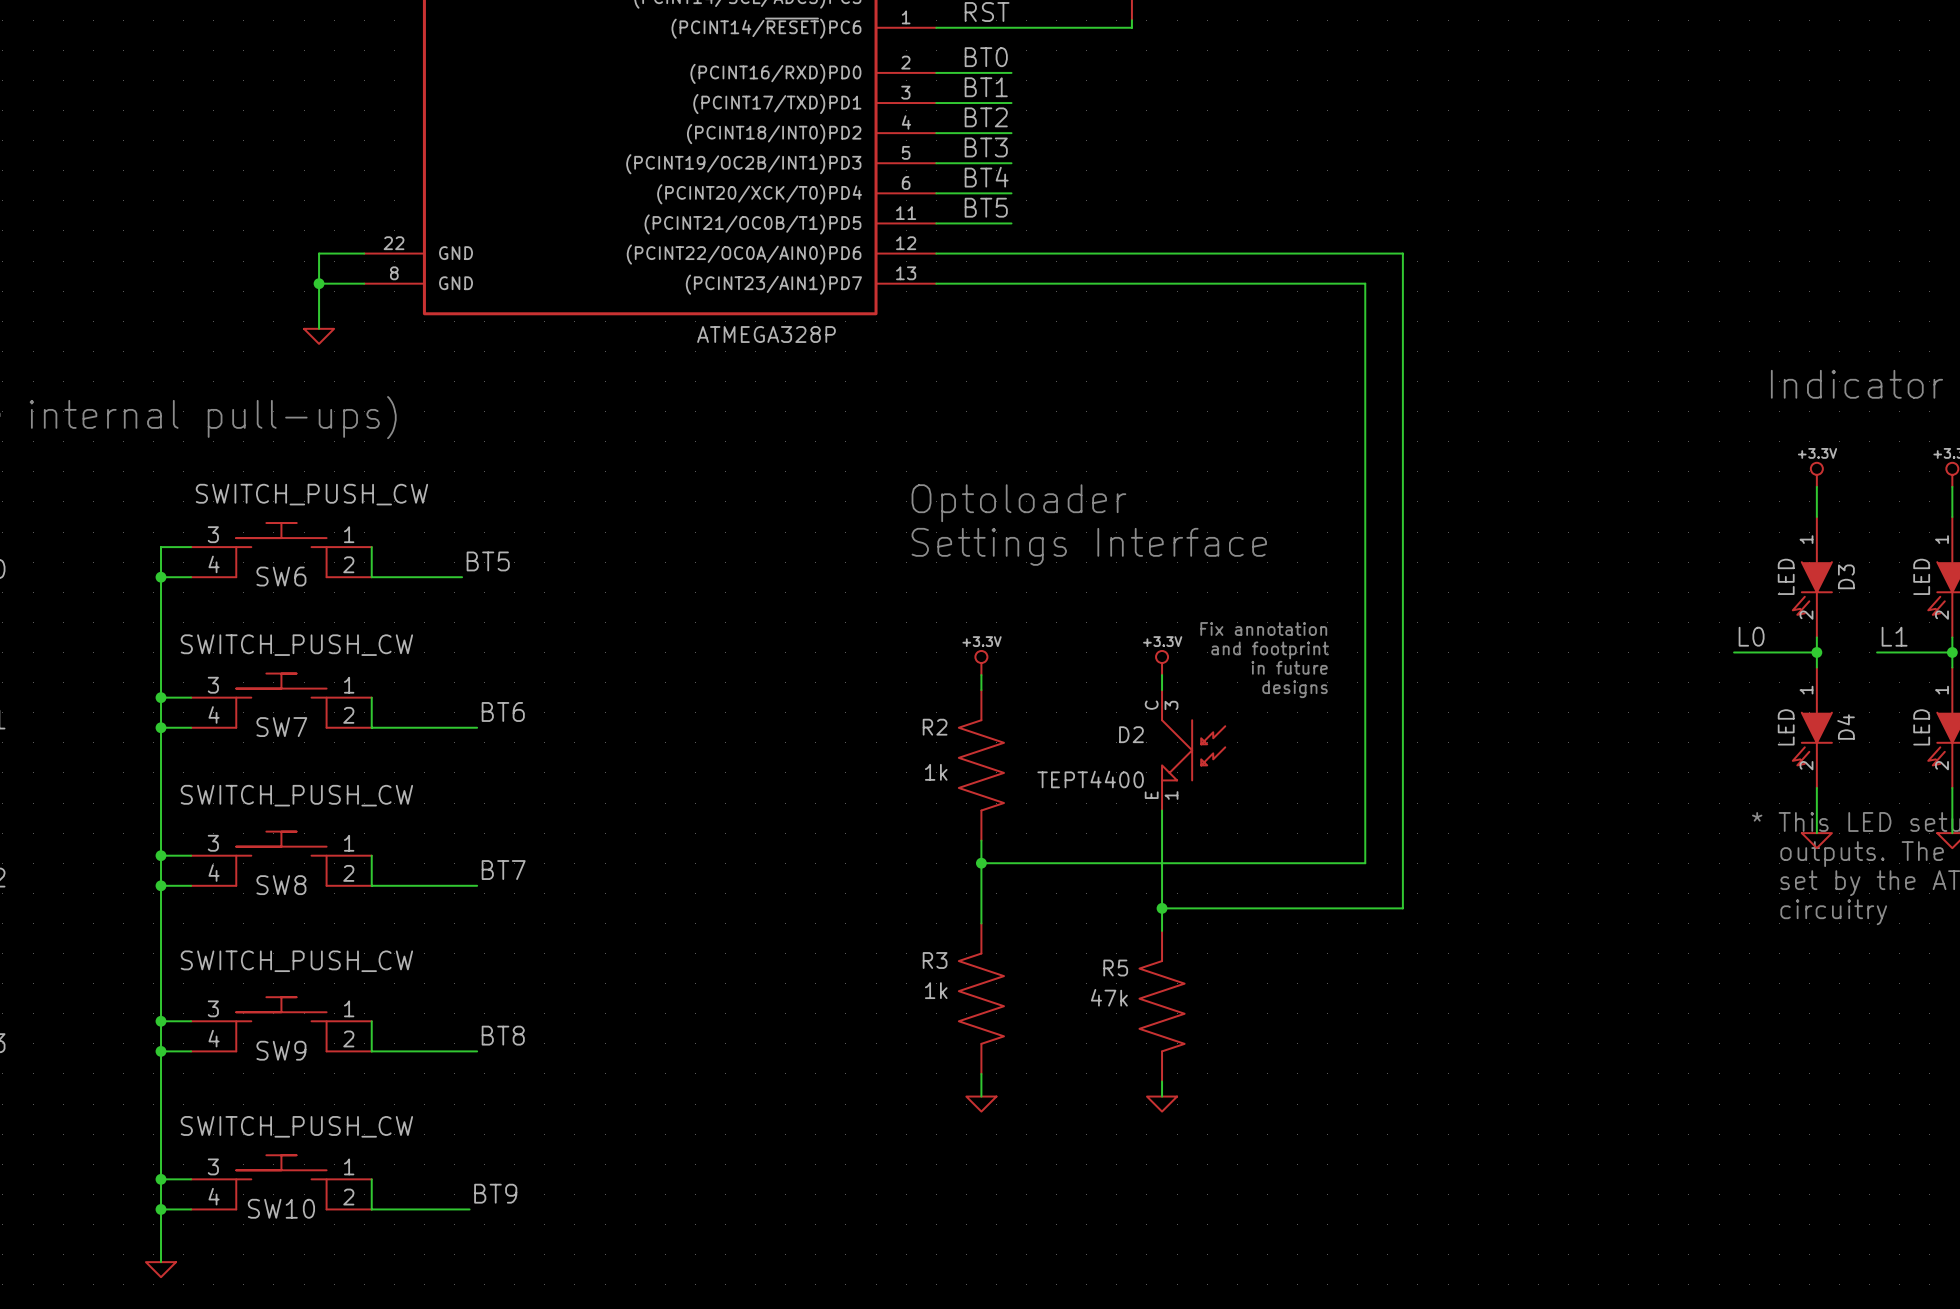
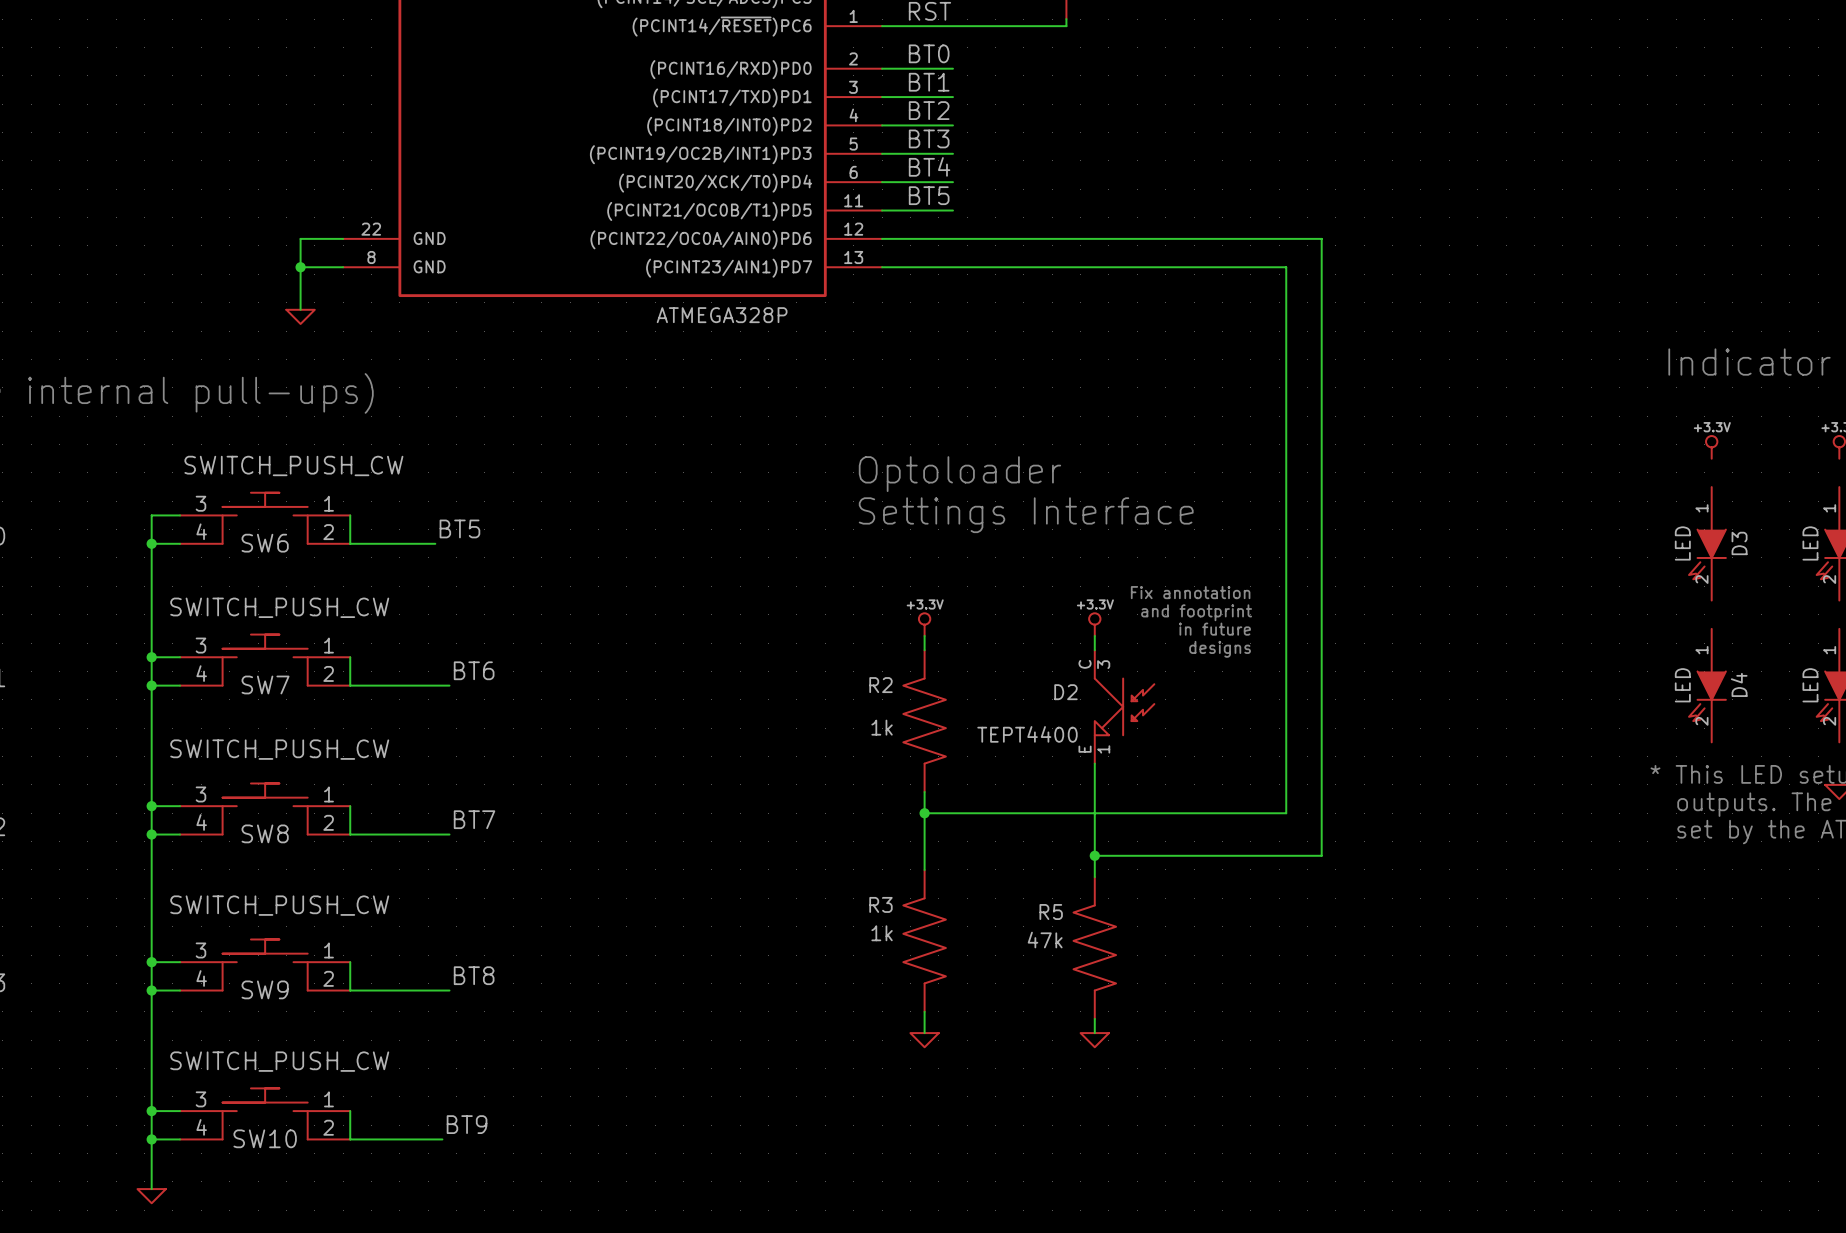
wire: (1816, 486) (1816, 516) -> none
wire: (1952, 486) (1952, 516) -> none
label: L0 (1751, 636) -> none
label: L1 (1894, 636) -> none
wire: (1816, 637) (1816, 667) -> none
wire: (1952, 637) (1952, 667) -> none
wire: (1734, 652) (1816, 652) -> none
junction: (1816, 652) -> none
wire: (1877, 652) (1952, 652) -> none
junction: (1952, 652) -> none
wire: (1816, 787) (1816, 833) -> none
wire: (1952, 787) (1952, 833) -> none
power symbol: (1816, 840) -> none
text: circuitry (1833, 912) -> none

